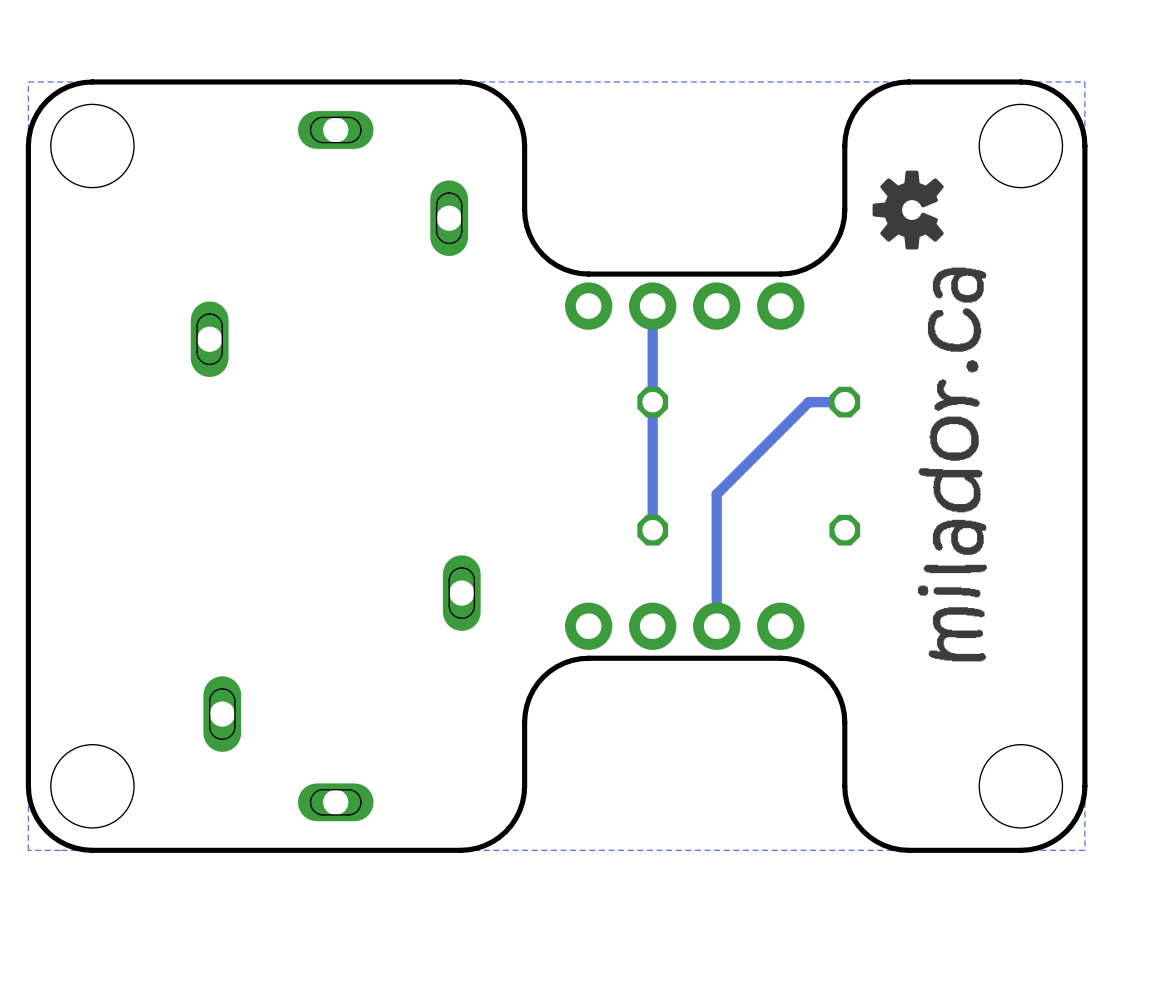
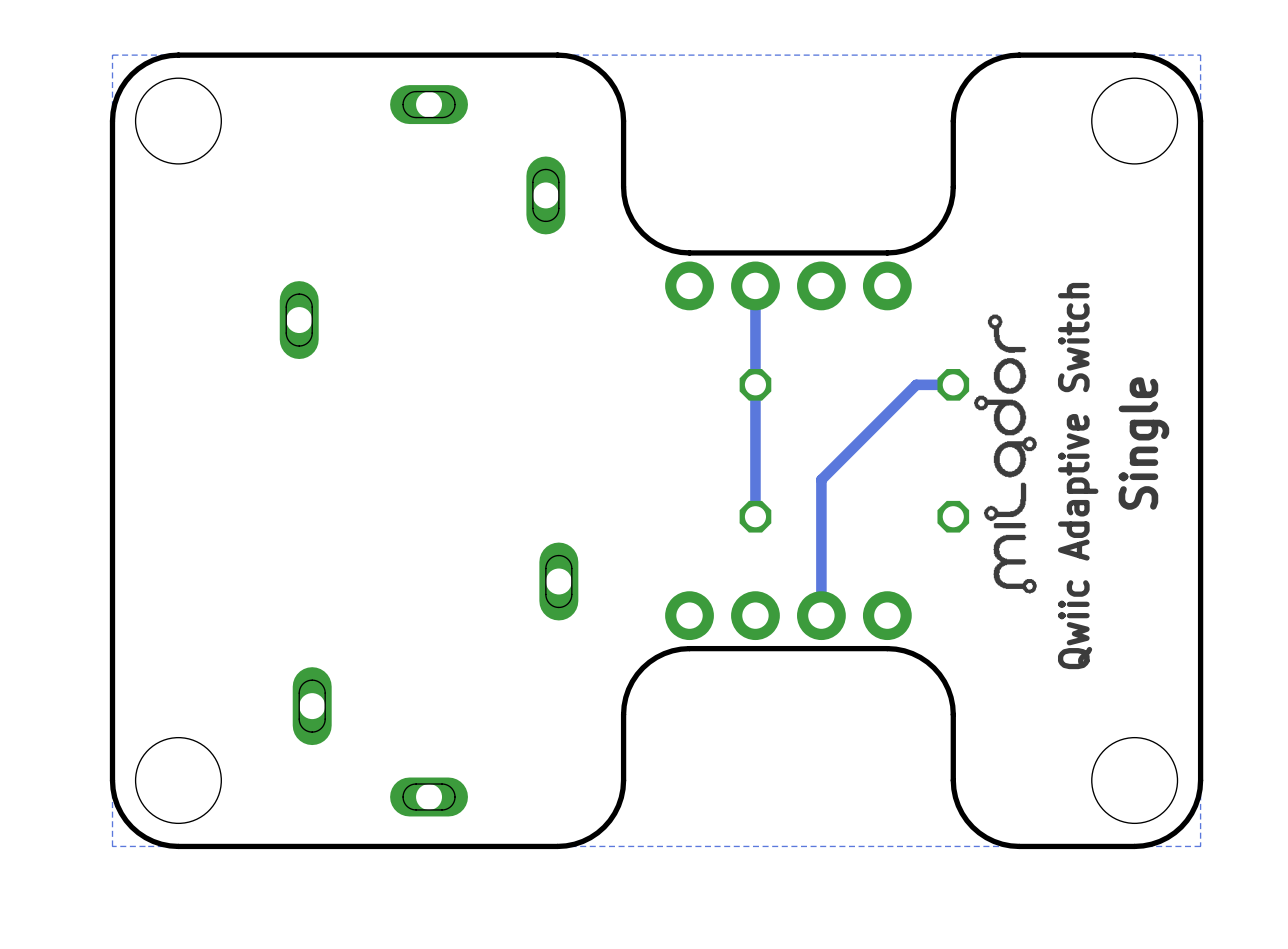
drawing: [872, 170, 988, 662] -> none
drawing: none -> [974, 314, 1037, 594]
text: none -> Single (1143, 443)
text: none -> Qwiic Adaptive Switch (1078, 476)

